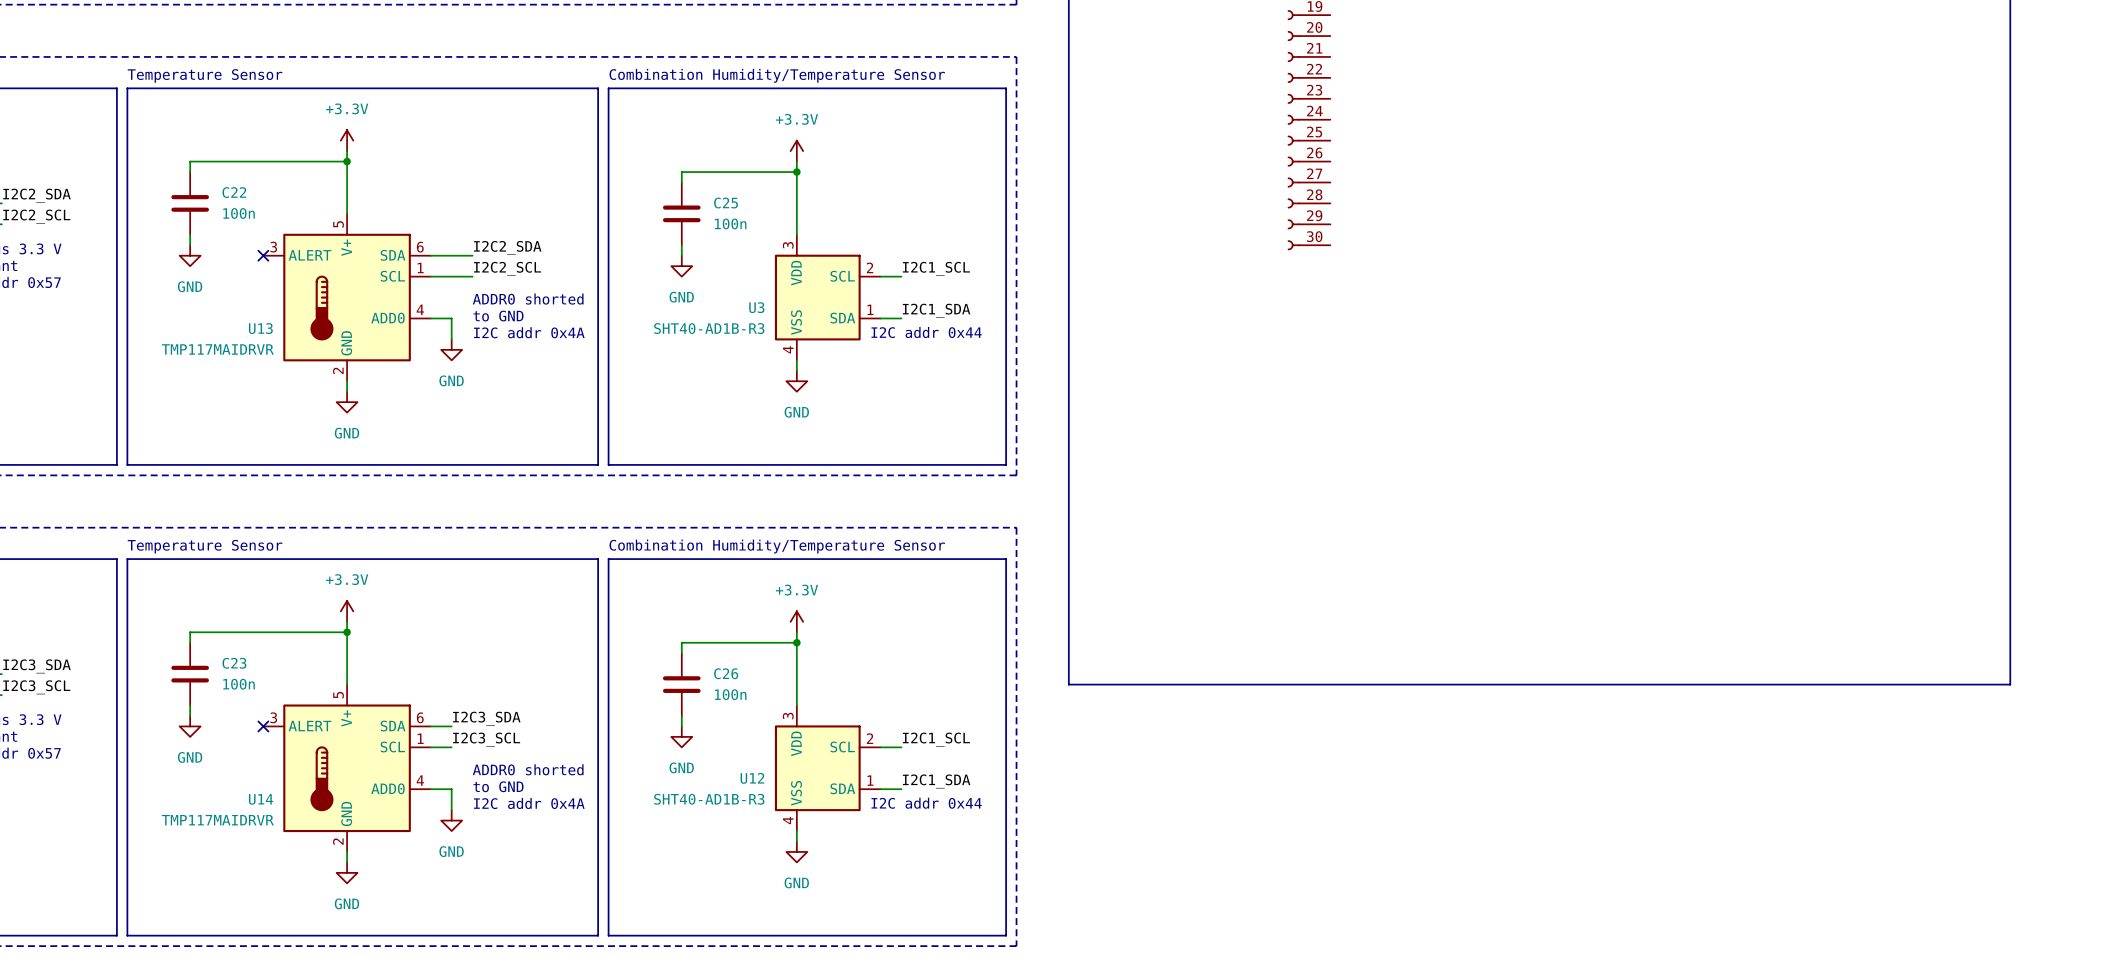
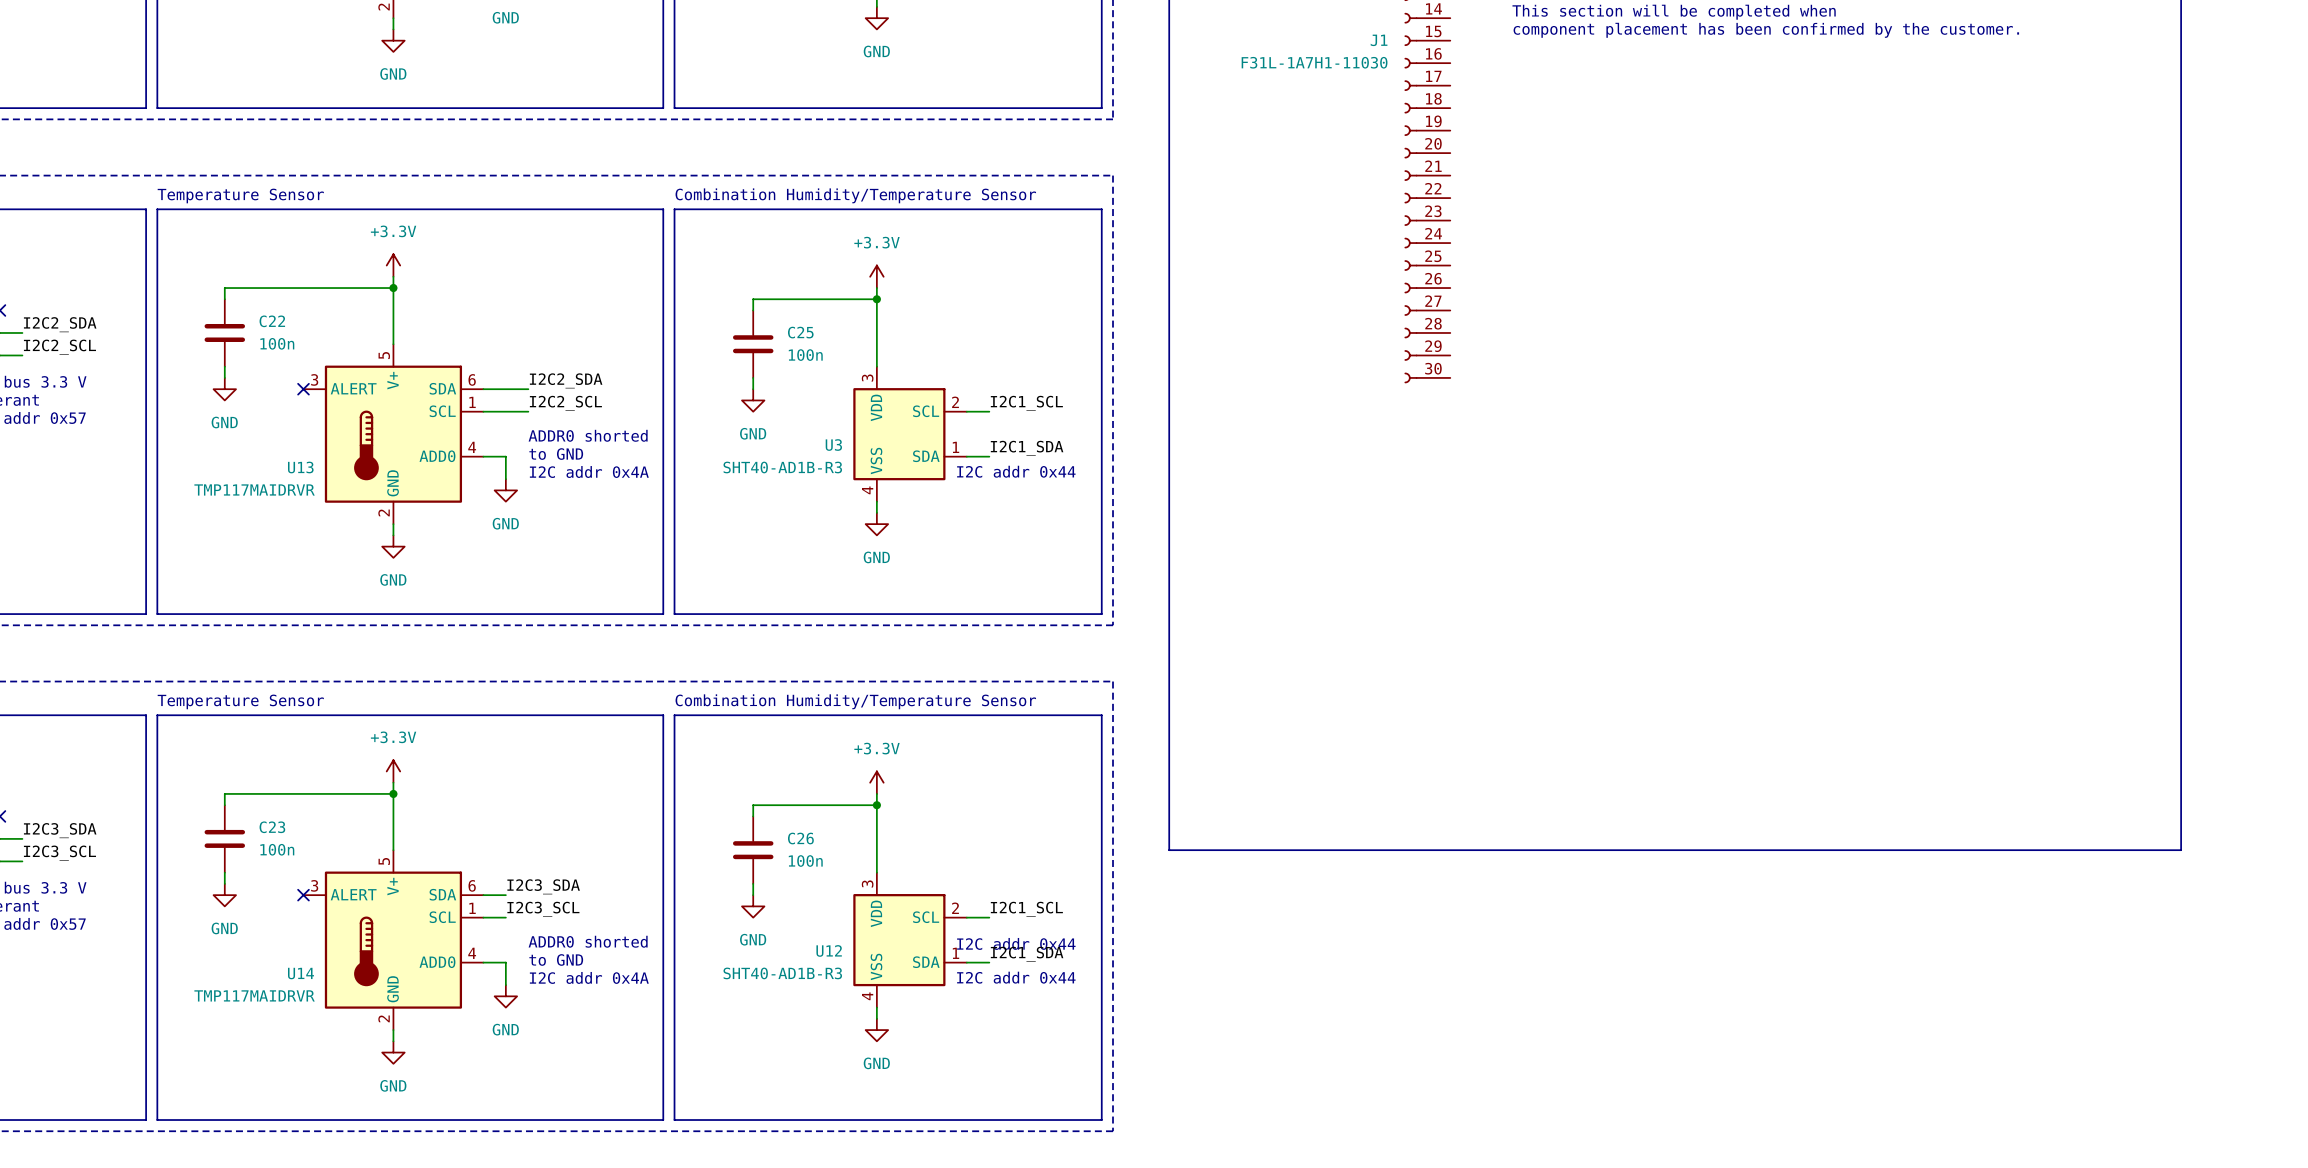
text: none -> I2C addr 0x44 (1016, 943)

